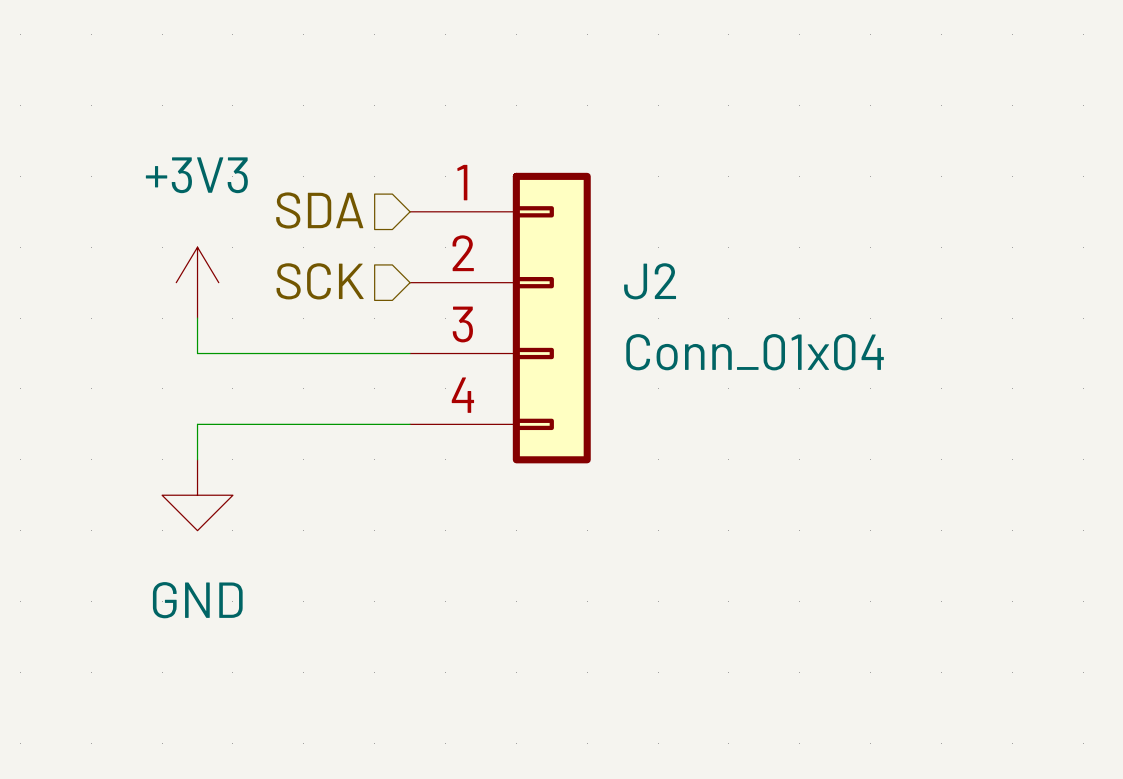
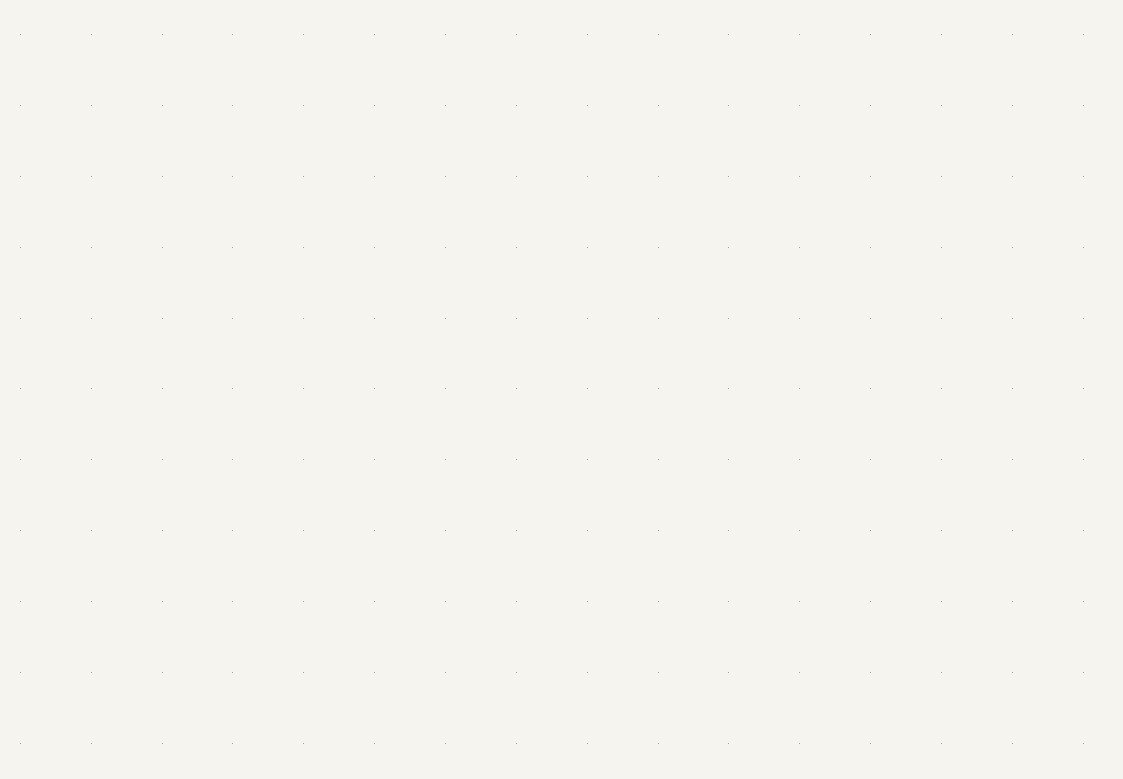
hierarchical label: SDA (319, 210) -> none
hierarchical label: SCK (320, 281) -> none
power symbol: +3V3 (197, 282) -> none
wire: (197, 318) (197, 353) (410, 353) -> none
J2: Conn_01x04 (500, 318) -> none
wire: (410, 424) (197, 424) (197, 459) -> none
power symbol: GND (197, 495) -> none

